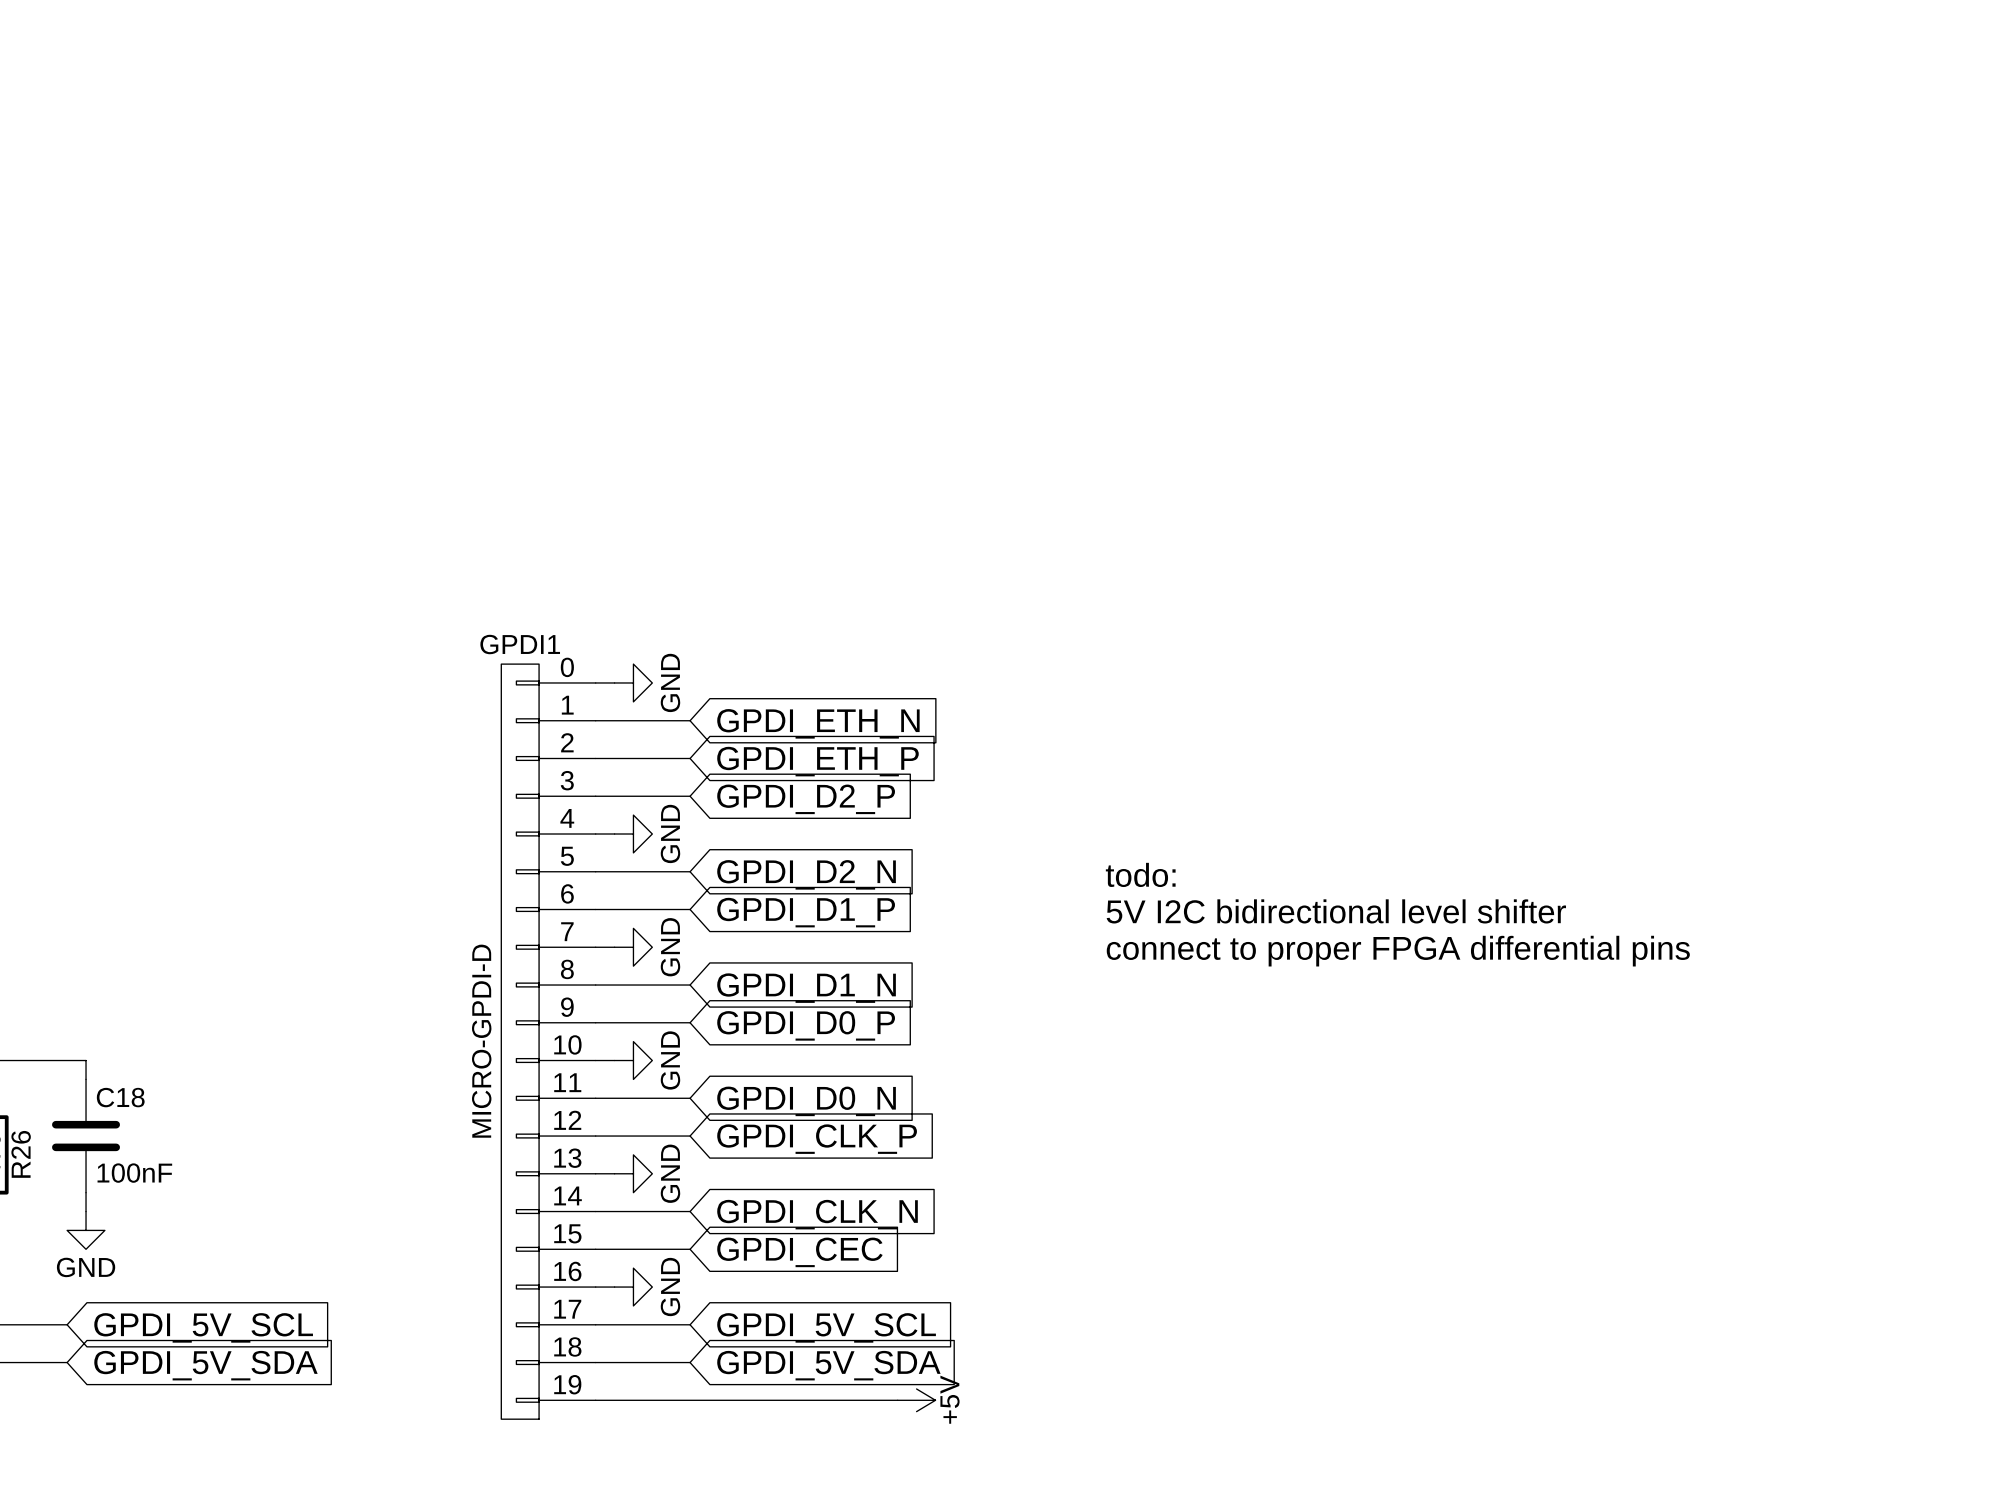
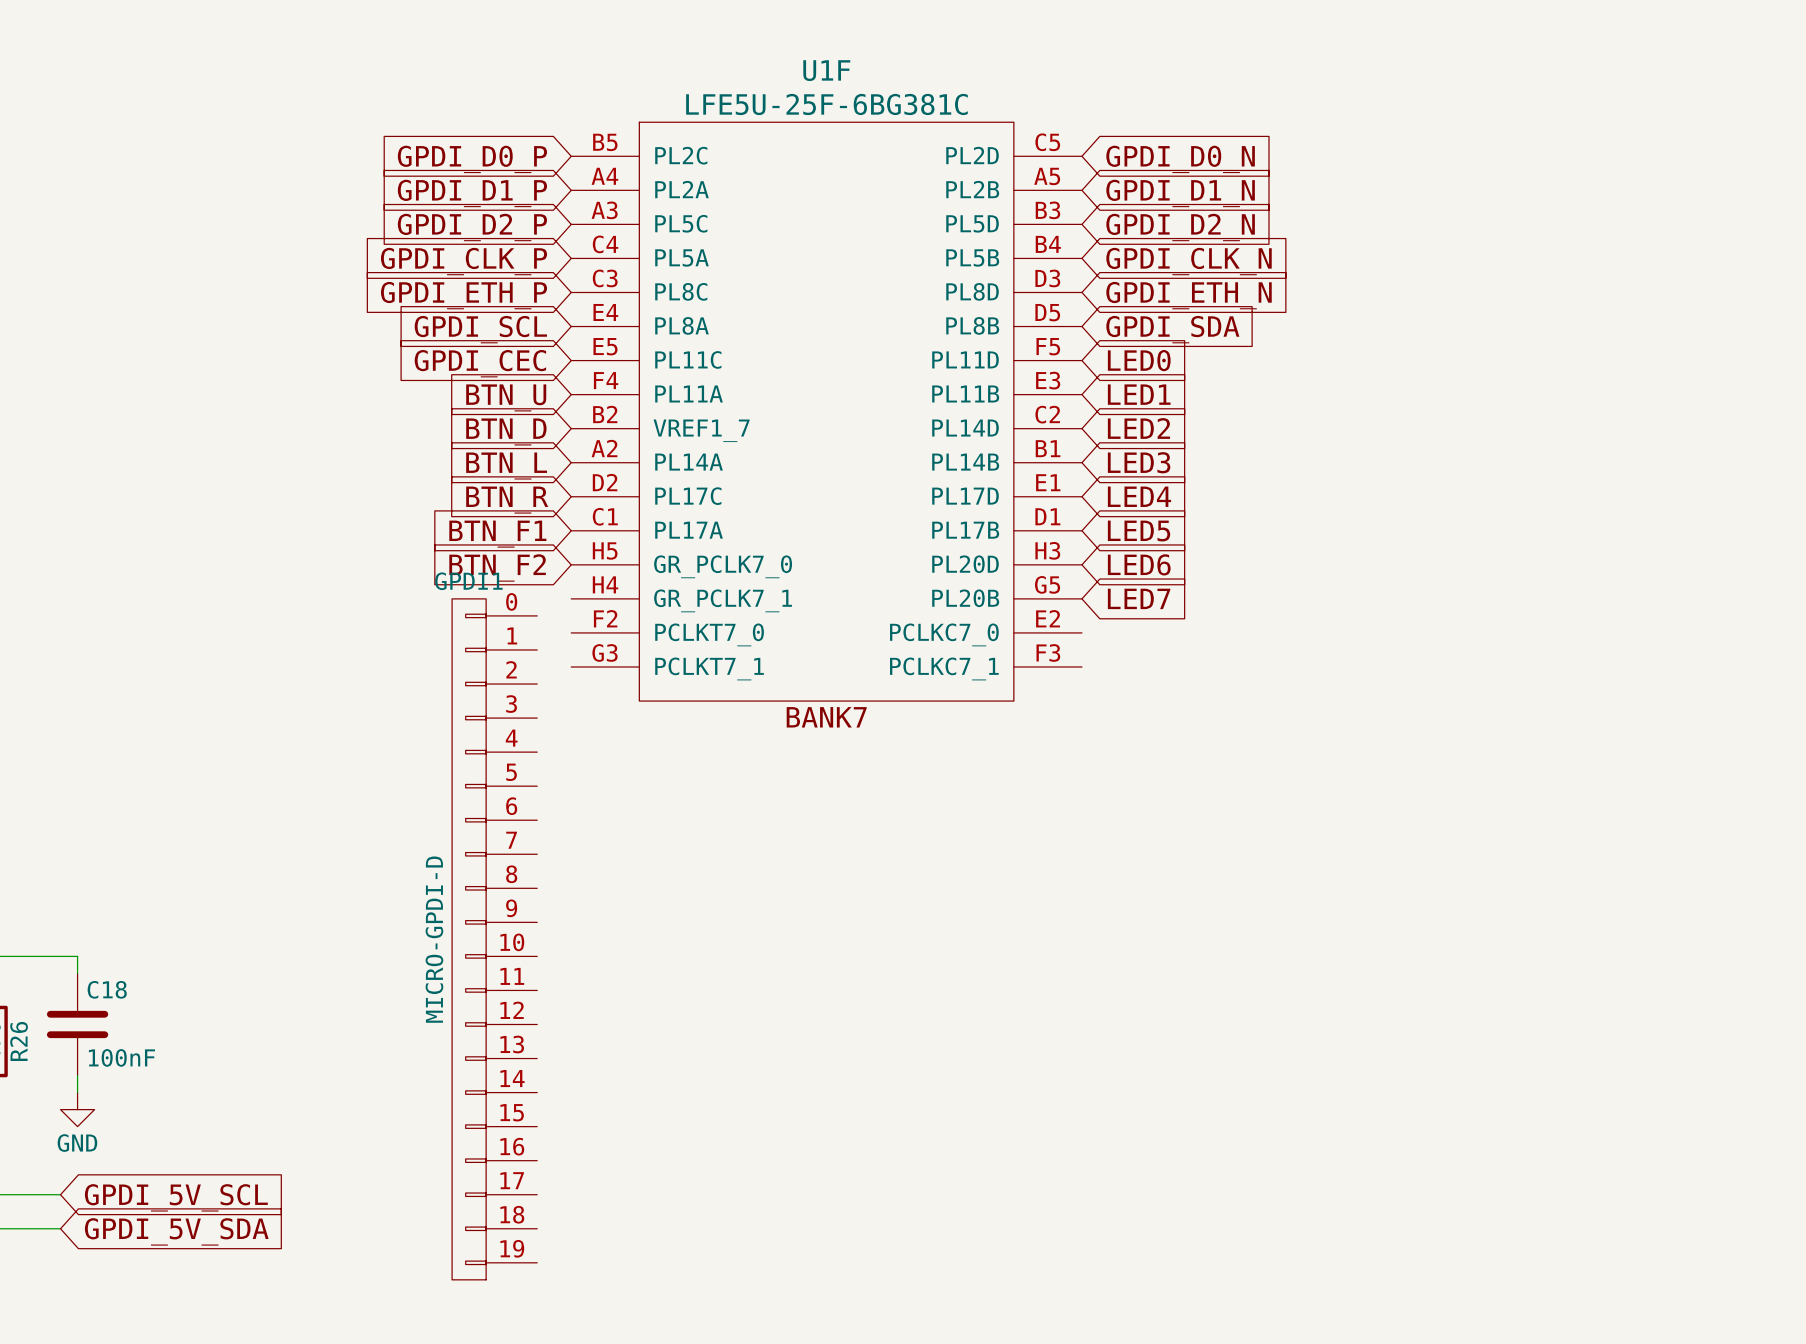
global label: none -> GPDI_D0_P (472, 159)
global label: none -> GPDI_D0_N (1180, 159)
global label: none -> GPDI_D1_P (472, 193)
global label: none -> GPDI_D1_N (1180, 193)
global label: none -> GPDI_D2_P (472, 227)
global label: none -> GPDI_D2_N (1180, 227)
global label: none -> GPDI_CLK_P (463, 261)
global label: none -> GPDI_CLK_N (1189, 261)
global label: none -> GPDI_ETH_P (463, 295)
global label: none -> GPDI_ETH_N (1189, 295)
global label: none -> GPDI_SCL (480, 329)
global label: none -> GPDI_SDA (1172, 329)
global label: none -> LED0 (1139, 360)
global label: none -> GPDI_CEC (480, 363)
global label: none -> LED1 (1139, 394)
global label: none -> BTN_U (506, 397)
U1F: none -> LFE5U-25F-6BG381C (826, 411)
global label: none -> LED2 (1138, 428)
global label: none -> BTN_D (506, 431)
global label: none -> LED3 (1139, 462)
global label: none -> BTN_L (506, 466)
global label: none -> LED4 (1139, 496)
global label: none -> BTN_R (507, 500)
global label: none -> LED5 (1139, 531)
global label: none -> BTN_F1 (497, 534)
global label: none -> LED6 (1139, 564)
global label: none -> BTN_F2 (497, 567)
global label: none -> LED7 (1139, 598)
wire: (595, 682) (614, 682) -> none
power symbol: GND (633, 682) -> none
wire: (595, 720) (690, 720) -> none
global label: GPDI_ETH_N (818, 723) -> none
wire: (595, 758) (690, 758) -> none
global label: GPDI_ETH_P (817, 761) -> none
wire: (595, 796) (690, 796) -> none
global label: GPDI_D2_P (806, 799) -> none
wire: (595, 834) (614, 834) -> none
power symbol: GND (633, 834) -> none
wire: (595, 871) (690, 871) -> none
global label: GPDI_D2_N (806, 874) -> none
text: todo: (1140, 874) -> none
wire: (595, 909) (690, 909) -> none
text: 5V I2C bidirectional level shifter (1336, 911) -> none
global label: GPDI_D1_P (806, 912) -> none
wire: (595, 947) (614, 947) -> none
power symbol: GND (633, 947) -> none
text: connect to proper FPGA differential pins (1398, 951) -> none
wire: (595, 985) (690, 985) -> none
global label: GPDI_D1_N (806, 988) -> none
wire: (595, 1022) (690, 1022) -> none
global label: GPDI_D0_P (806, 1025) -> none
wire: (595, 1060) (614, 1060) -> none
power symbol: GND (633, 1060) -> none
wire: (595, 1098) (690, 1098) -> none
global label: GPDI_D0_N (806, 1101) -> none
wire: (595, 1136) (690, 1136) -> none
global label: GPDI_CLK_P (817, 1139) -> none
wire: (595, 1173) (614, 1173) -> none
power symbol: GND (633, 1173) -> none
wire: (595, 1211) (690, 1211) -> none
global label: GPDI_CLK_N (817, 1214) -> none
wire: (595, 1249) (690, 1249) -> none
global label: GPDI_CEC (799, 1252) -> none
wire: (595, 1287) (614, 1287) -> none
power symbol: GND (633, 1287) -> none
wire: (595, 1324) (690, 1324) -> none
global label: GPDI_5V_SCL (826, 1327) -> none
wire: (595, 1362) (690, 1362) -> none
global label: GPDI_5V_SDA (828, 1365) -> none
wire: (595, 1400) (897, 1400) -> none
power symbol: +5V (916, 1400) -> none

